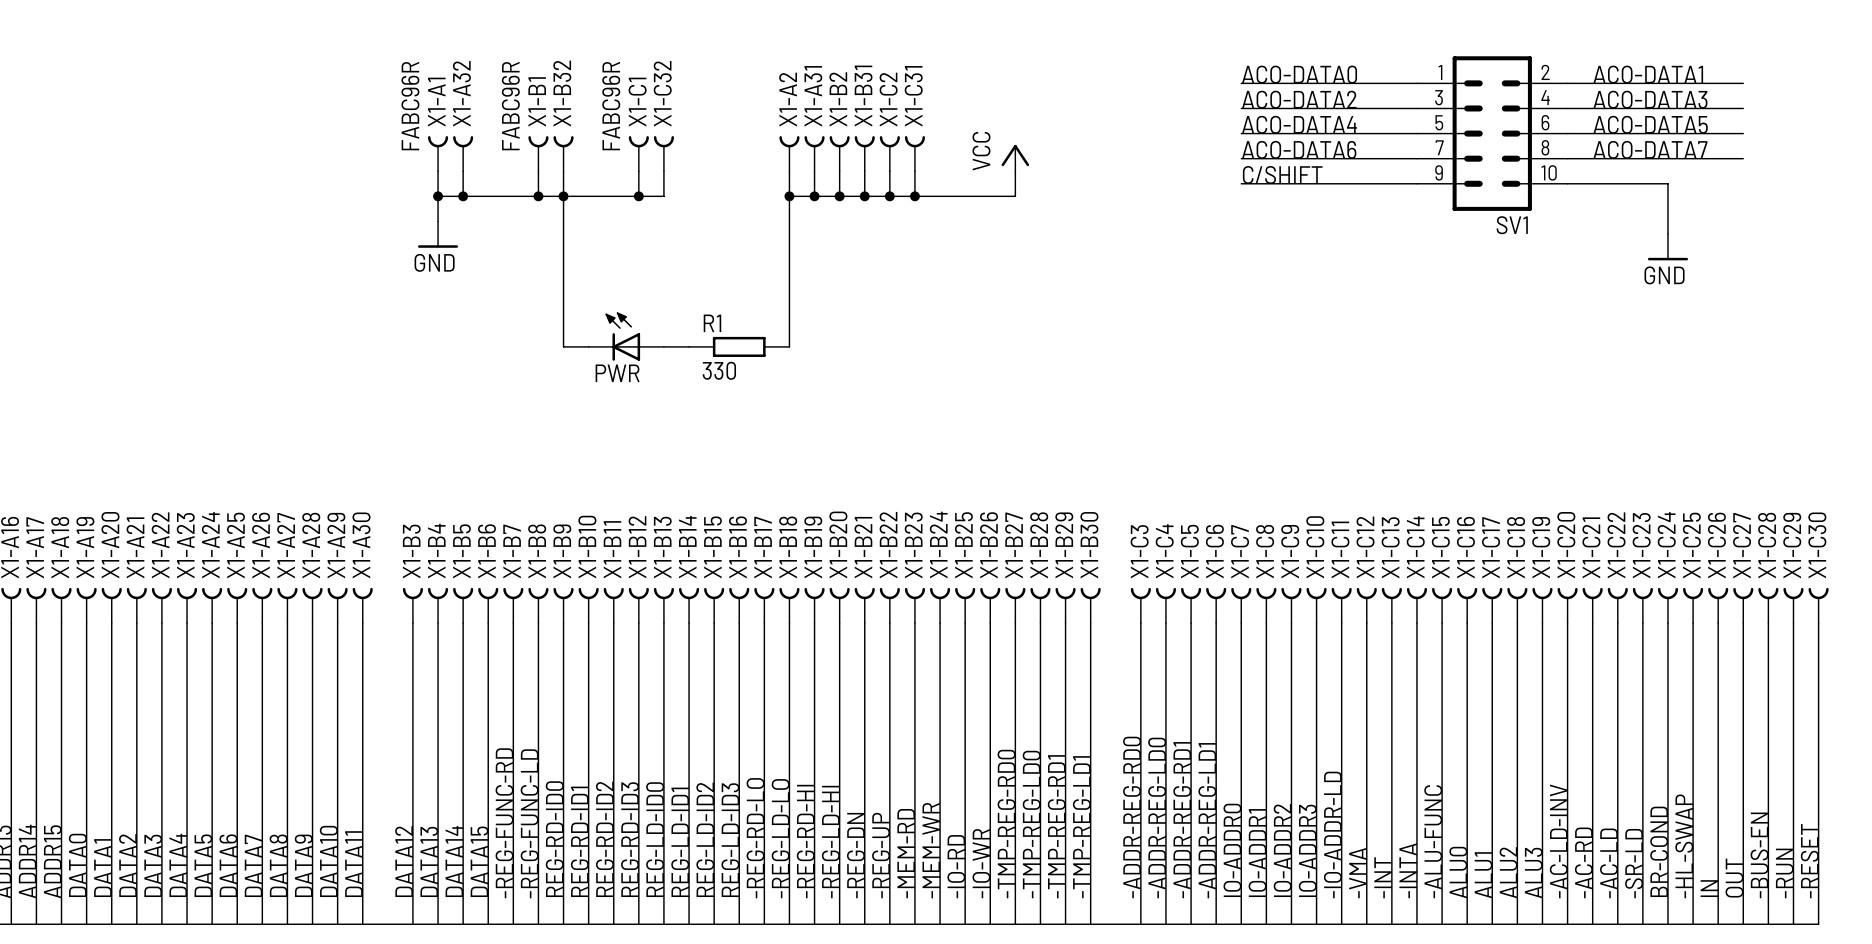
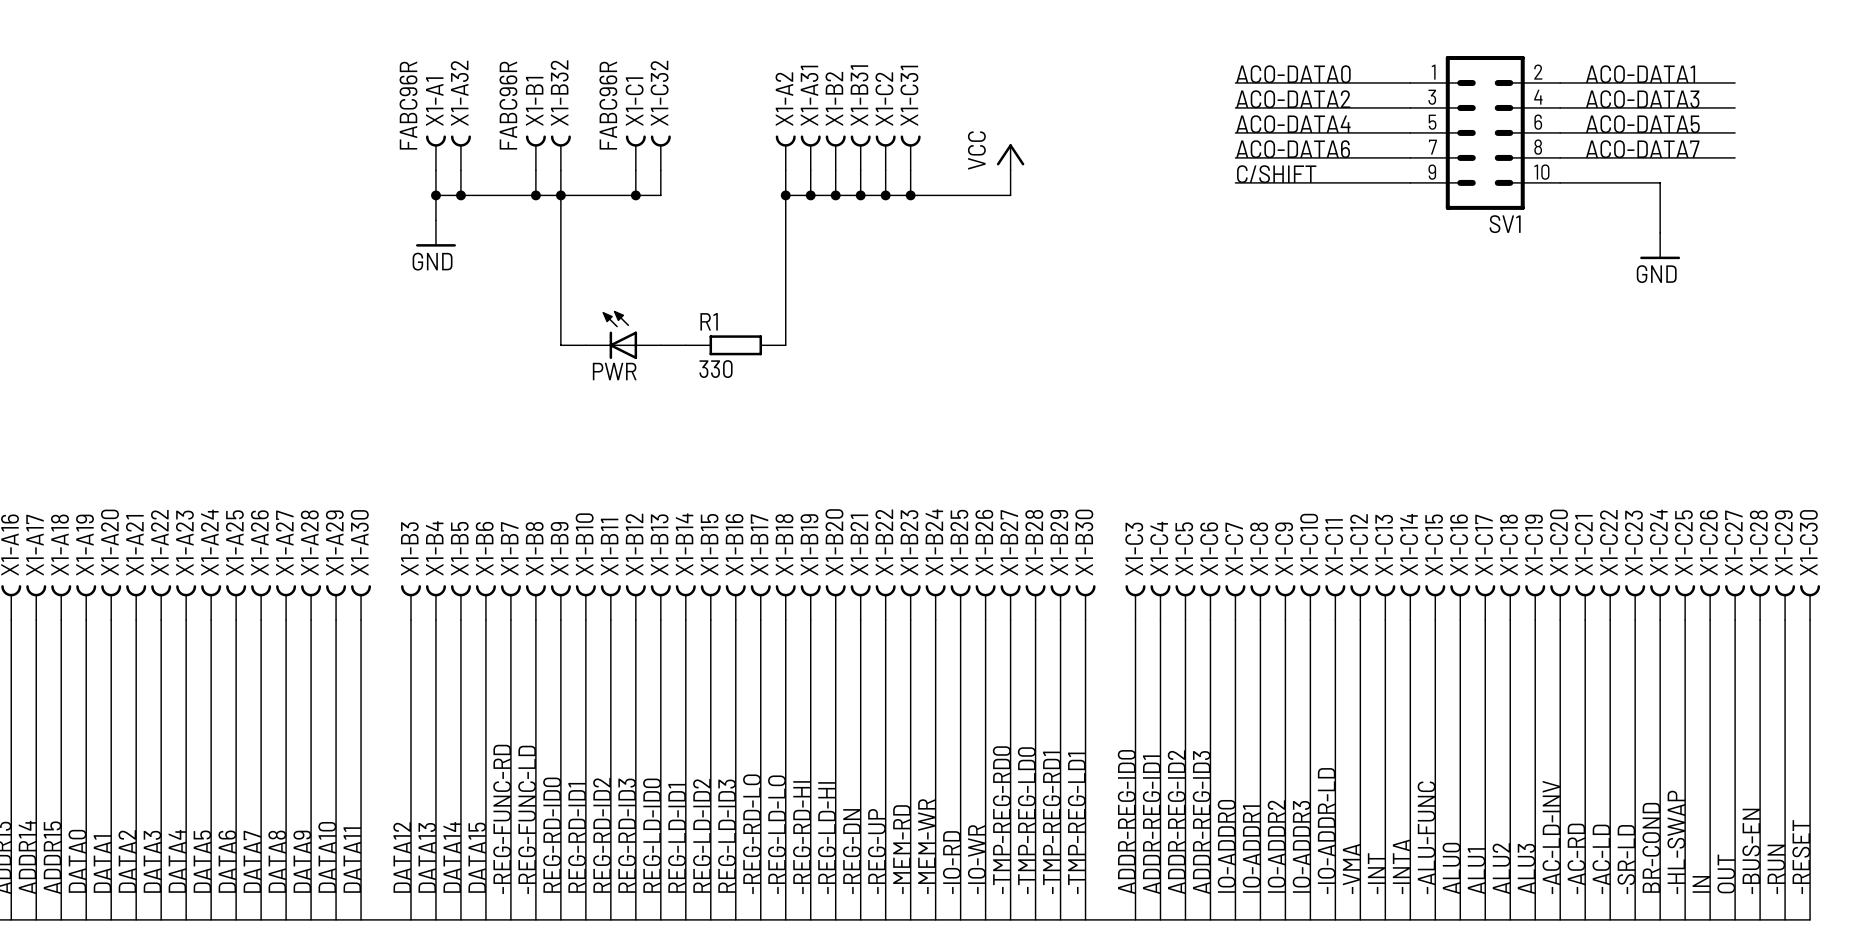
label: -ADDR-REG-RD0 (1132, 817) -> ADDR-REG-ID0 (1126, 822)
label: -ADDR-REG-LD0 (1157, 817) -> ADDR-REG-ID1 (1151, 824)
label: -ADDR-REG-RD1 (1182, 820) -> ADDR-REG-ID2 (1176, 822)
label: -ADDR-REG-LD1 (1207, 820) -> ADDR-REG-ID3 (1201, 822)

